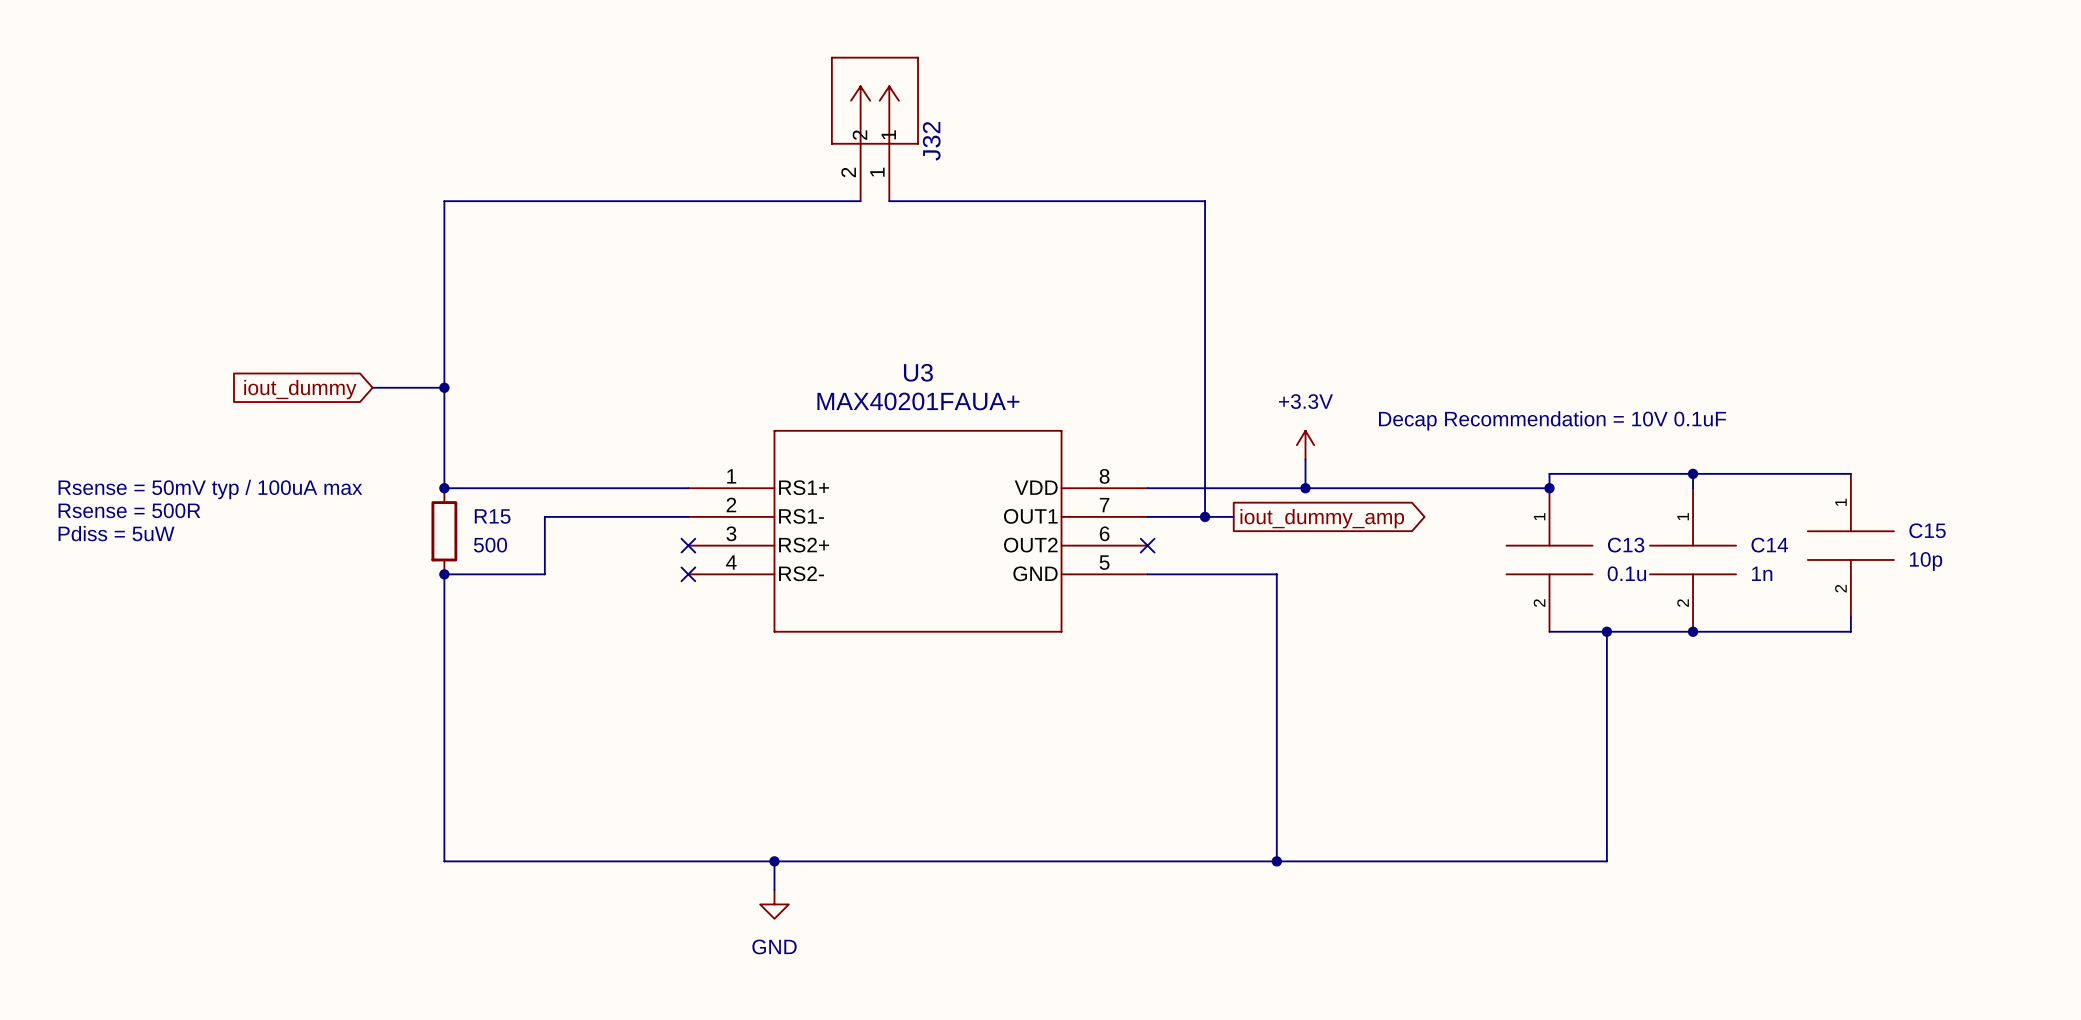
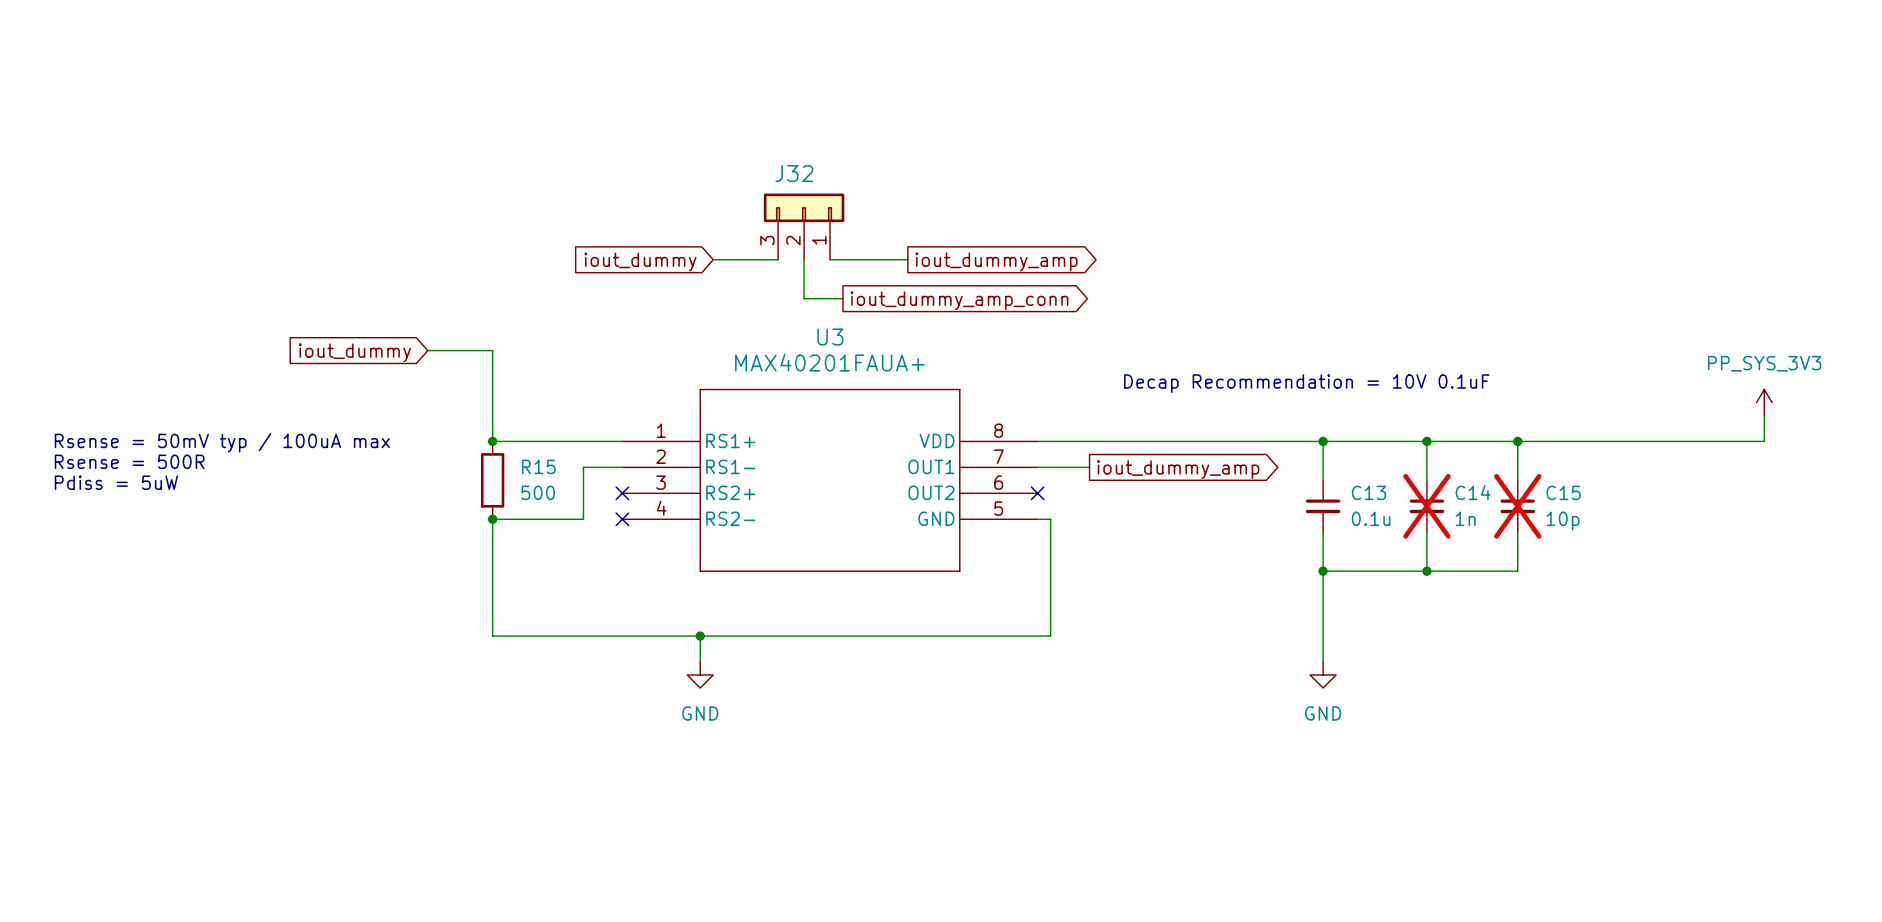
J32 symbol: [831, 56, 919, 202] -> [763, 193, 845, 260]
J32 name position: J32 (931, 141) -> J32 (794, 173)
wire: (860, 201) (444, 201) (444, 488) (544, 488) -> (427, 350) (492, 350) (492, 441)
wire: (889, 201) (1205, 201) (1205, 516) (1233, 516) -> none
wire: none -> (713, 259) (778, 259)
wire: none -> (804, 259) (804, 298) (842, 298)
wire: none -> (830, 259) (907, 259)
global label: none -> iout_dummy (640, 261)
global label: none -> iout_dummy_amp (996, 261)
global label: none -> iout_dummy_amp_conn (959, 300)
wire: (372, 387) (444, 387) -> none
junction: (444, 387) -> none
global label position: iout_dummy (300, 389) -> iout_dummy (354, 352)
text position: Decap Recommendation = 10V 0.1uF (1552, 420) -> Decap Recommendation = 10V 0.1uF (1306, 383)
power symbol: +3.3V (1305, 445) -> none
power symbol: none -> PP_SYS_3V3 (1764, 402)
wire: (1305, 459) (1305, 488) -> none
wire: (1693, 473) (1693, 488) -> none
junction position: (1693, 473) -> (1517, 441)
C15 symbol: [1807, 473, 1894, 618] -> [1500, 480, 1536, 533]
wire: (1850, 473) (1549, 473) (1549, 488) -> (1764, 415) (1764, 441) (1400, 441)
junction: (444, 488) -> none
junction: none -> (492, 441)
junction: (1305, 488) -> none
wire: none -> (1323, 441) (1323, 480)
junction: none -> (1323, 441)
C13 symbol: [1506, 488, 1593, 632] -> [1305, 480, 1341, 533]
junction position: (1549, 488) -> (1426, 441)
wire: none -> (1426, 441) (1426, 480)
C14 symbol: [1649, 488, 1737, 632] -> [1409, 480, 1445, 533]
wire: none -> (1517, 441) (1517, 480)
wire: (645, 516) (544, 516) (544, 574) (444, 574) (444, 861) (1606, 861) (1606, 631) -> (583, 467) (583, 519) (492, 519) (492, 636) (1050, 636) (1050, 519)
junction: (1205, 516) -> none
global label position: iout_dummy_amp (1322, 518) -> iout_dummy_amp (1178, 469)
C15 name position: C15 (1927, 530) -> C15 (1563, 492)
R15 position: (444, 531) -> (492, 480)
C13 name position: C13 (1626, 545) -> C13 (1368, 492)
C14 name position: C14 (1769, 545) -> C14 (1473, 492)
C14 do-not-place cross: none -> (1426, 506)
C15 do-not-place cross: none -> (1517, 506)
C15 value position: 10p (1926, 561) -> 10p (1562, 521)
C13 value position: 0.1u (1626, 573) -> 0.1u (1371, 518)
C14 value position: 1n (1762, 573) -> 1n (1465, 518)
junction: (444, 574) -> none
junction: none -> (492, 519)
wire: (1161, 574) (1276, 574) (1276, 861) -> none
wire: none -> (1323, 532) (1323, 662)
wire: none -> (1426, 532) (1426, 571)
wire: (1850, 617) (1850, 631) (1678, 631) -> (1517, 532) (1517, 571)
wire: none -> (1323, 571) (1400, 571)
junction: none -> (1323, 571)
junction position: (1606, 631) -> (1426, 571)
junction: (1693, 631) -> none
junction: none -> (700, 636)
power symbol: none -> GND (1323, 675)
wire: (774, 861) (774, 890) -> (700, 636) (700, 662)
junction: (774, 861) -> none
junction: (1276, 861) -> none
power symbol position: GND (774, 904) -> GND (700, 675)

